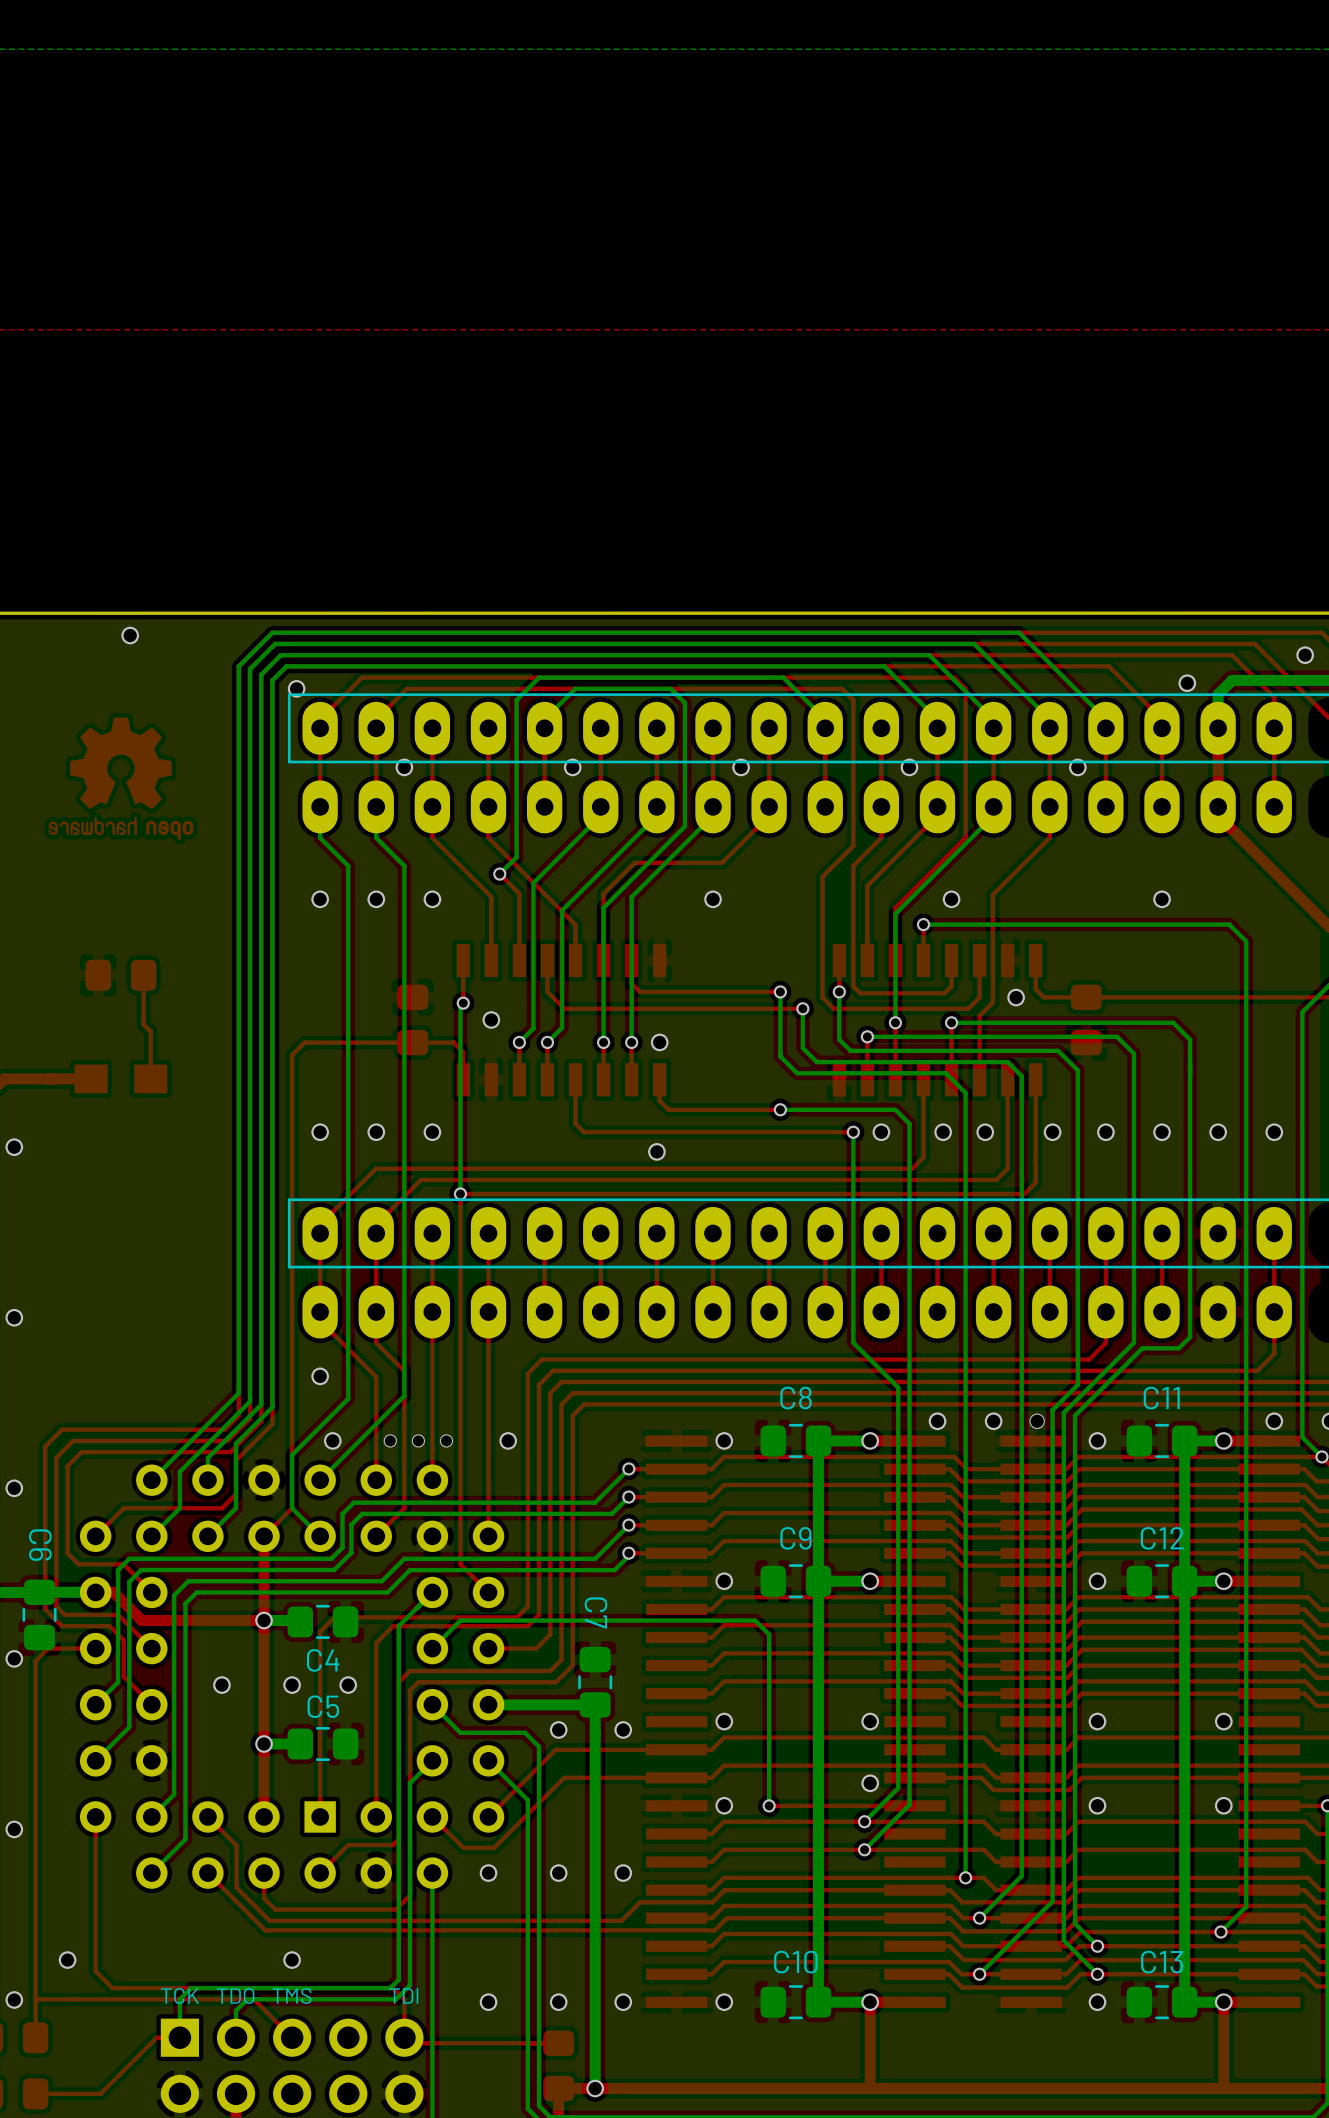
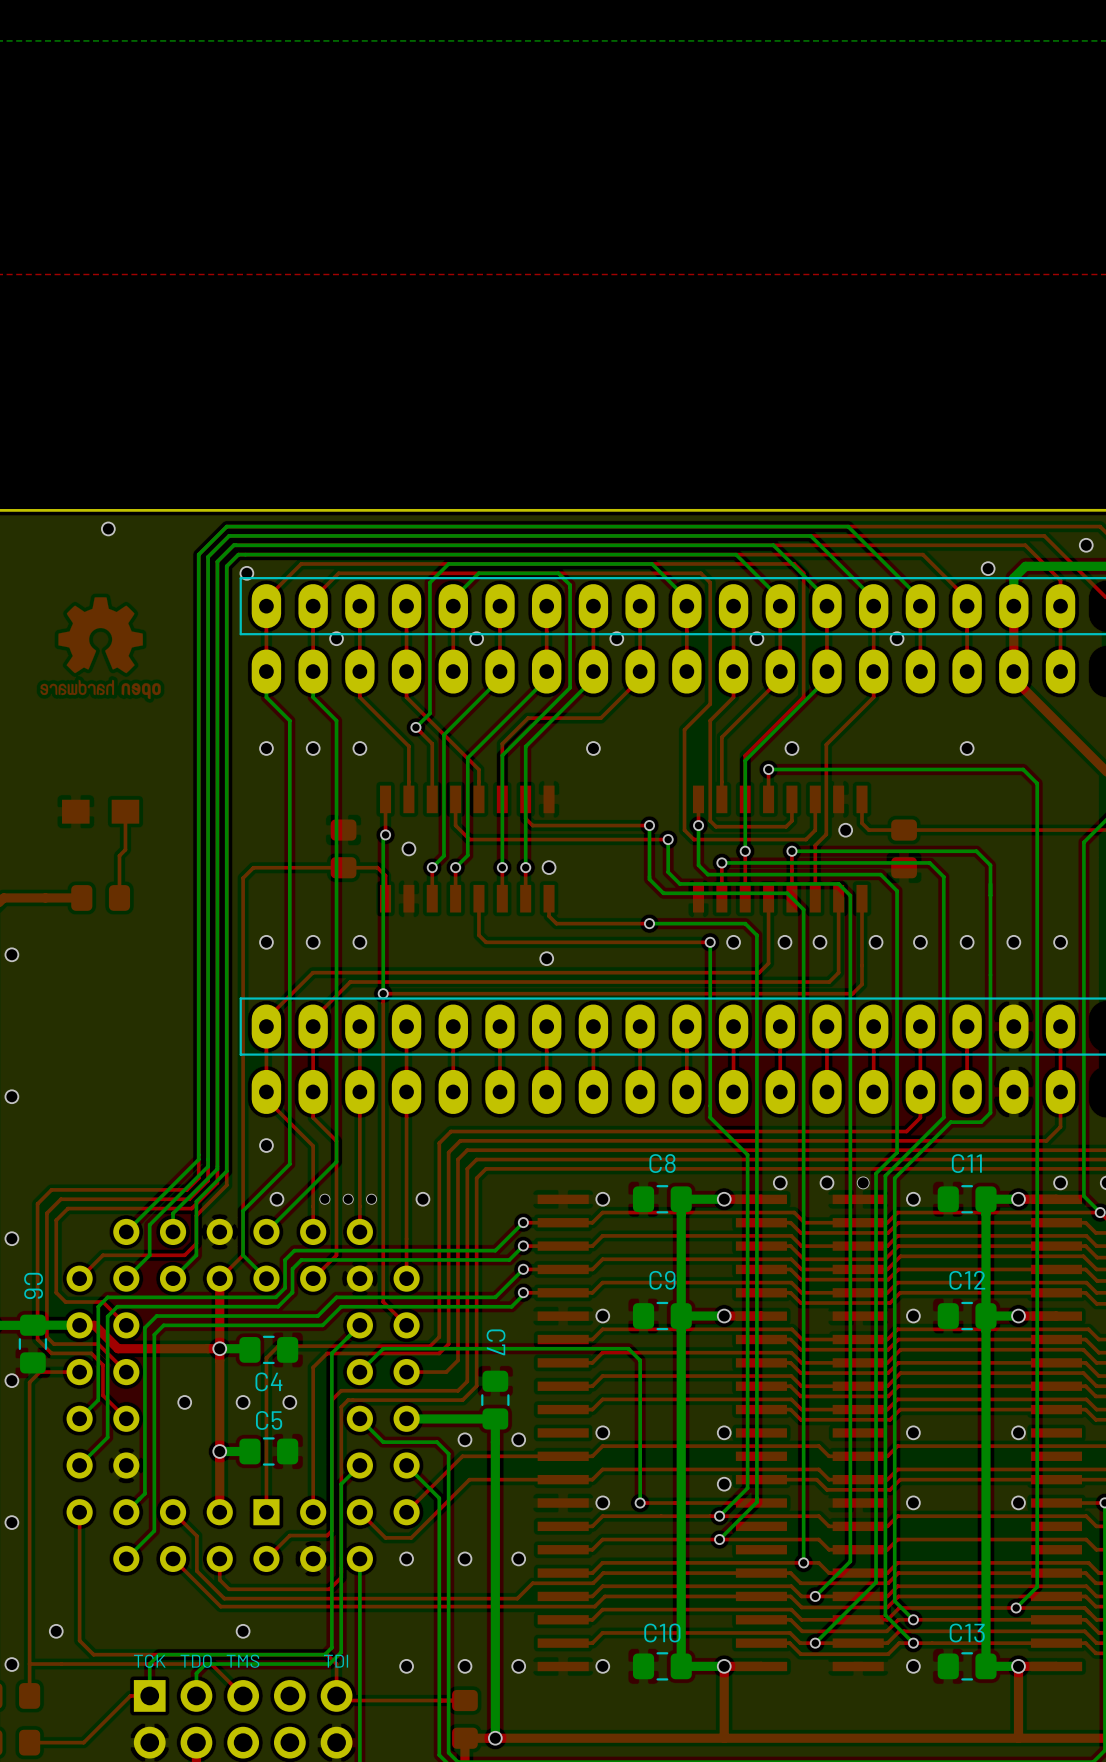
part footprint: [85, 959, 157, 991] -> [62, 799, 140, 824]
top track: (143, 975) (143, 1024) (150, 1031) (150, 1078) -> none
top track: none -> (125, 811) (125, 849) (119, 855) (119, 897)
part footprint: [74, 1064, 168, 1094] -> [71, 885, 131, 911]

